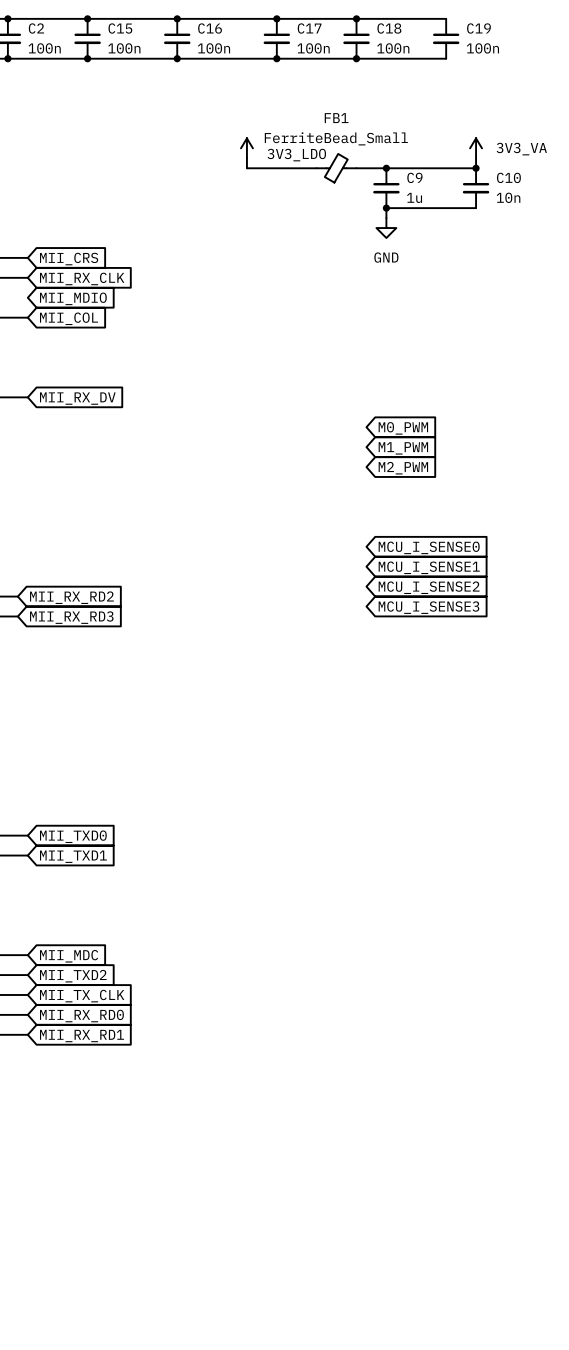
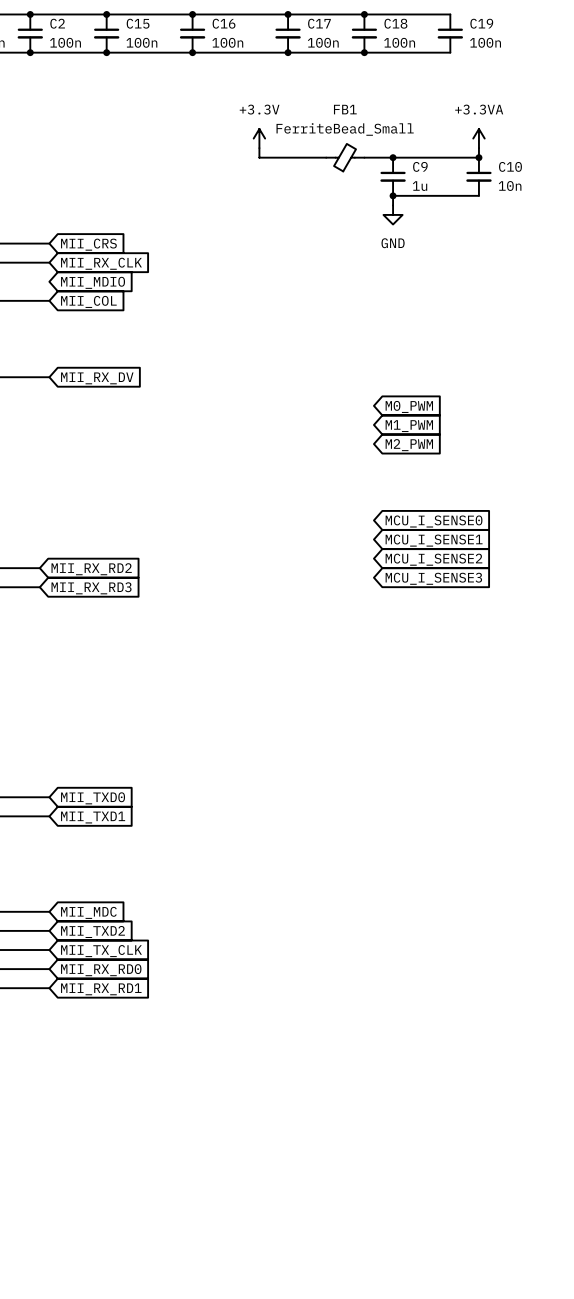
power symbol: 3V3_LDO (246, 148) -> +3.3V (259, 138)
power symbol: 3V3_VA (476, 148) -> +3.3VA (478, 138)

